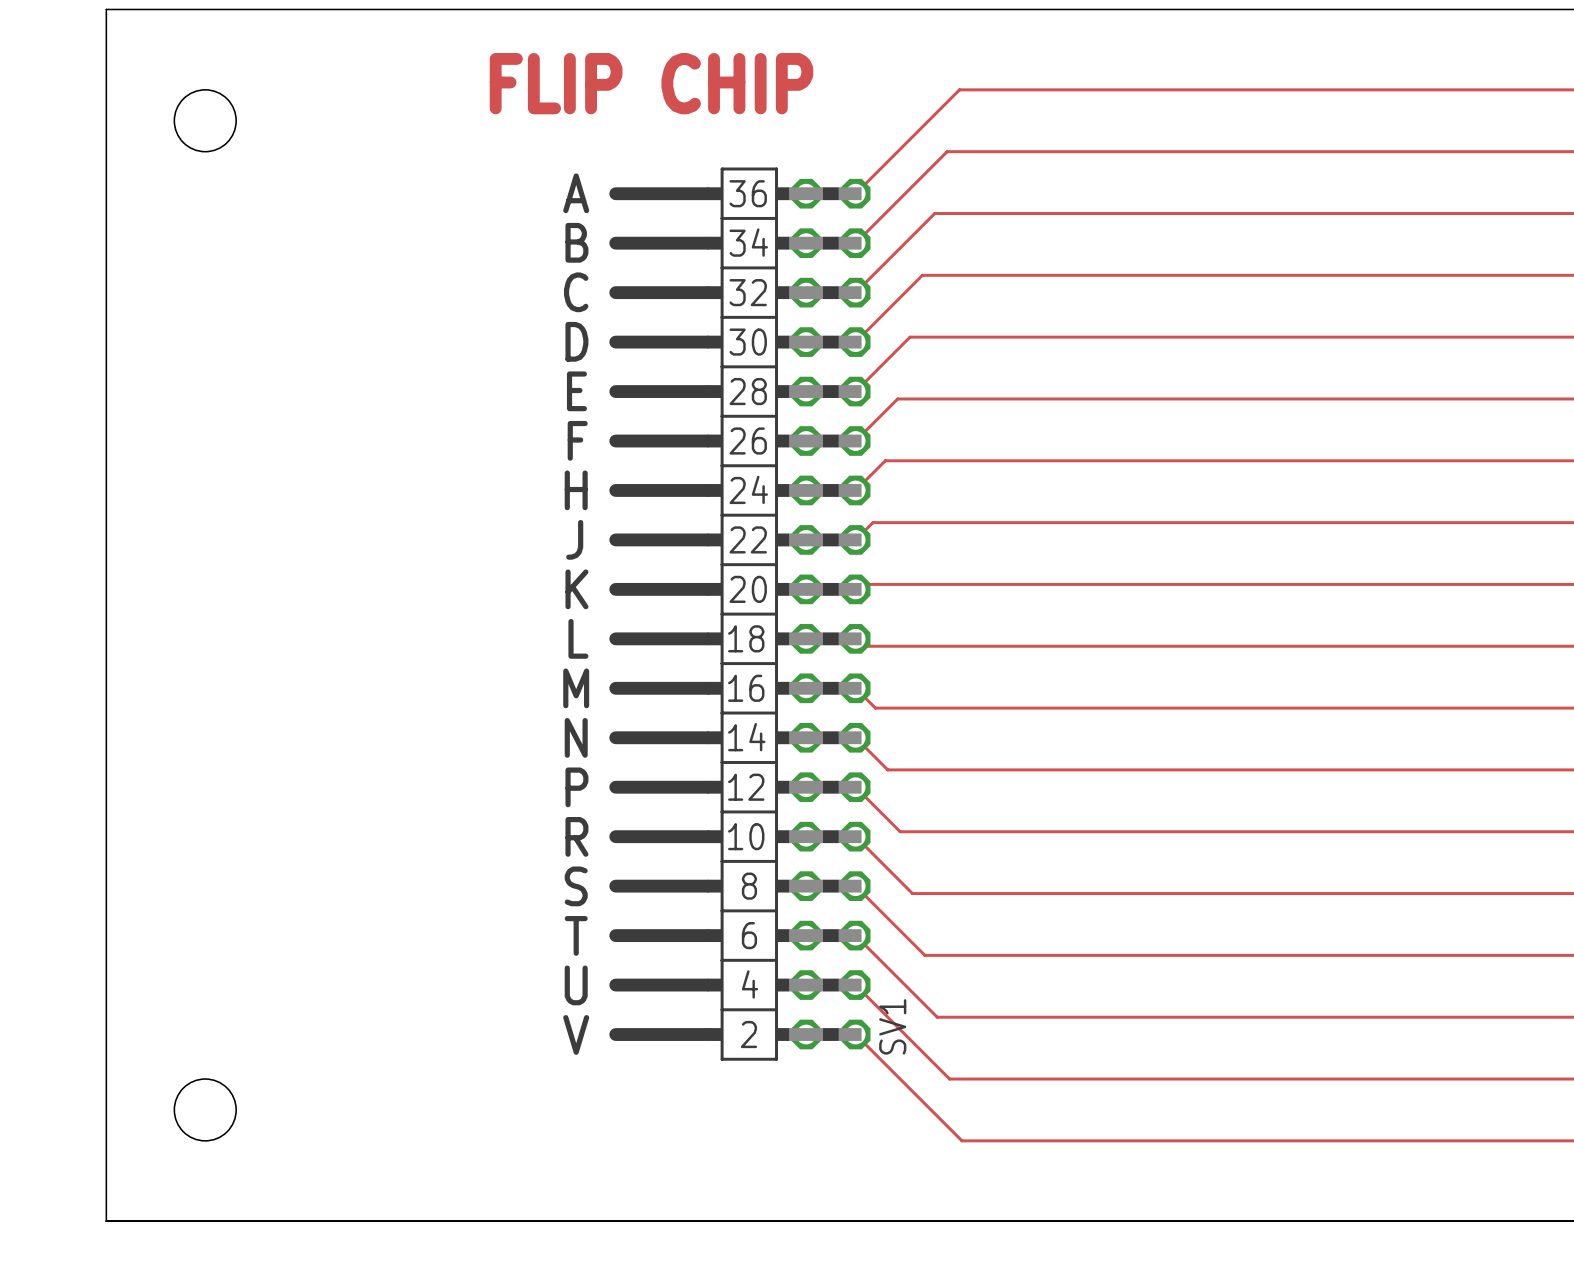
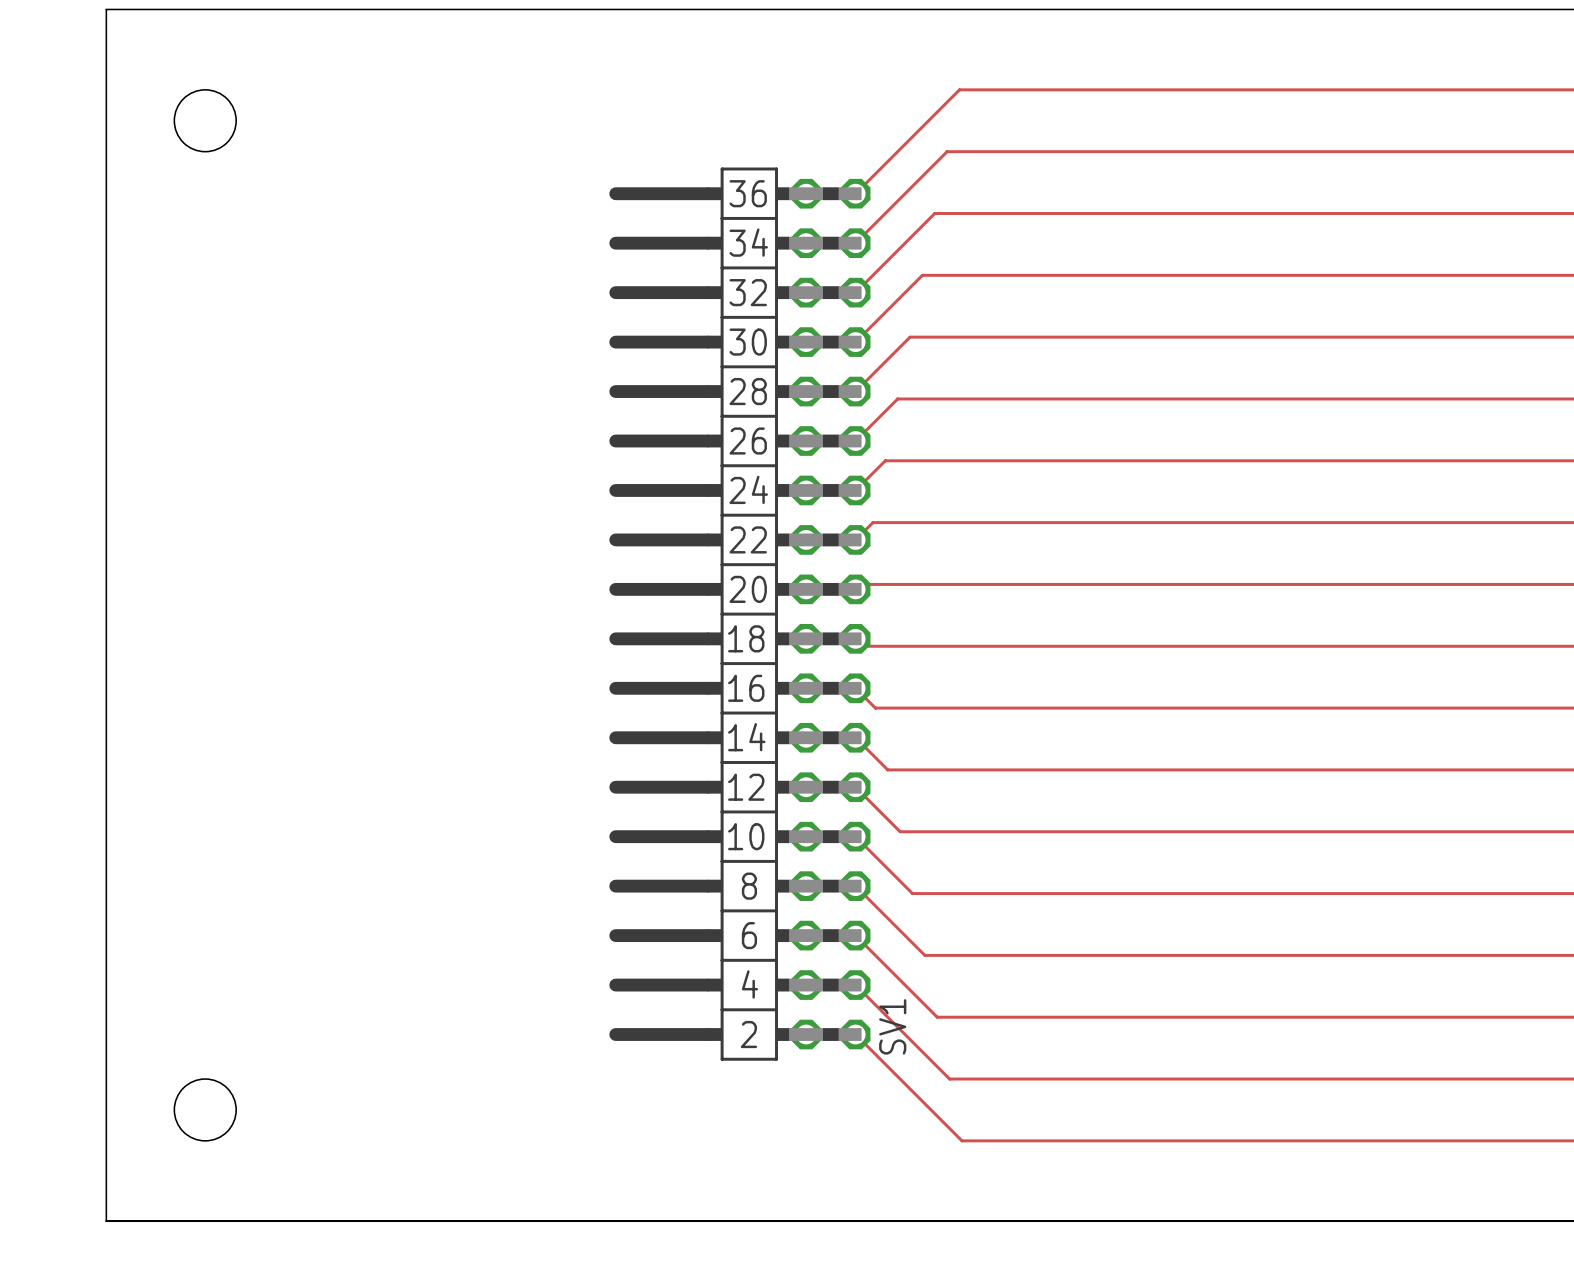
drawing: [489, 53, 814, 115] -> none
text: A (576, 193) -> none
text: B (576, 242) -> none
text: C (576, 292) -> none
text: D (576, 341) -> none
text: E (576, 391) -> none
text: F (577, 440) -> none
text: H (576, 490) -> none
text: J (574, 539) -> none
text: K (576, 589) -> none
text: L (578, 638) -> none
text: M (576, 688) -> none
text: N (576, 737) -> none
text: P (576, 787) -> none
text: R (576, 836) -> none
text: S (576, 886) -> none
text: T (576, 935) -> none
text: U (576, 985) -> none
text: V (576, 1034) -> none

